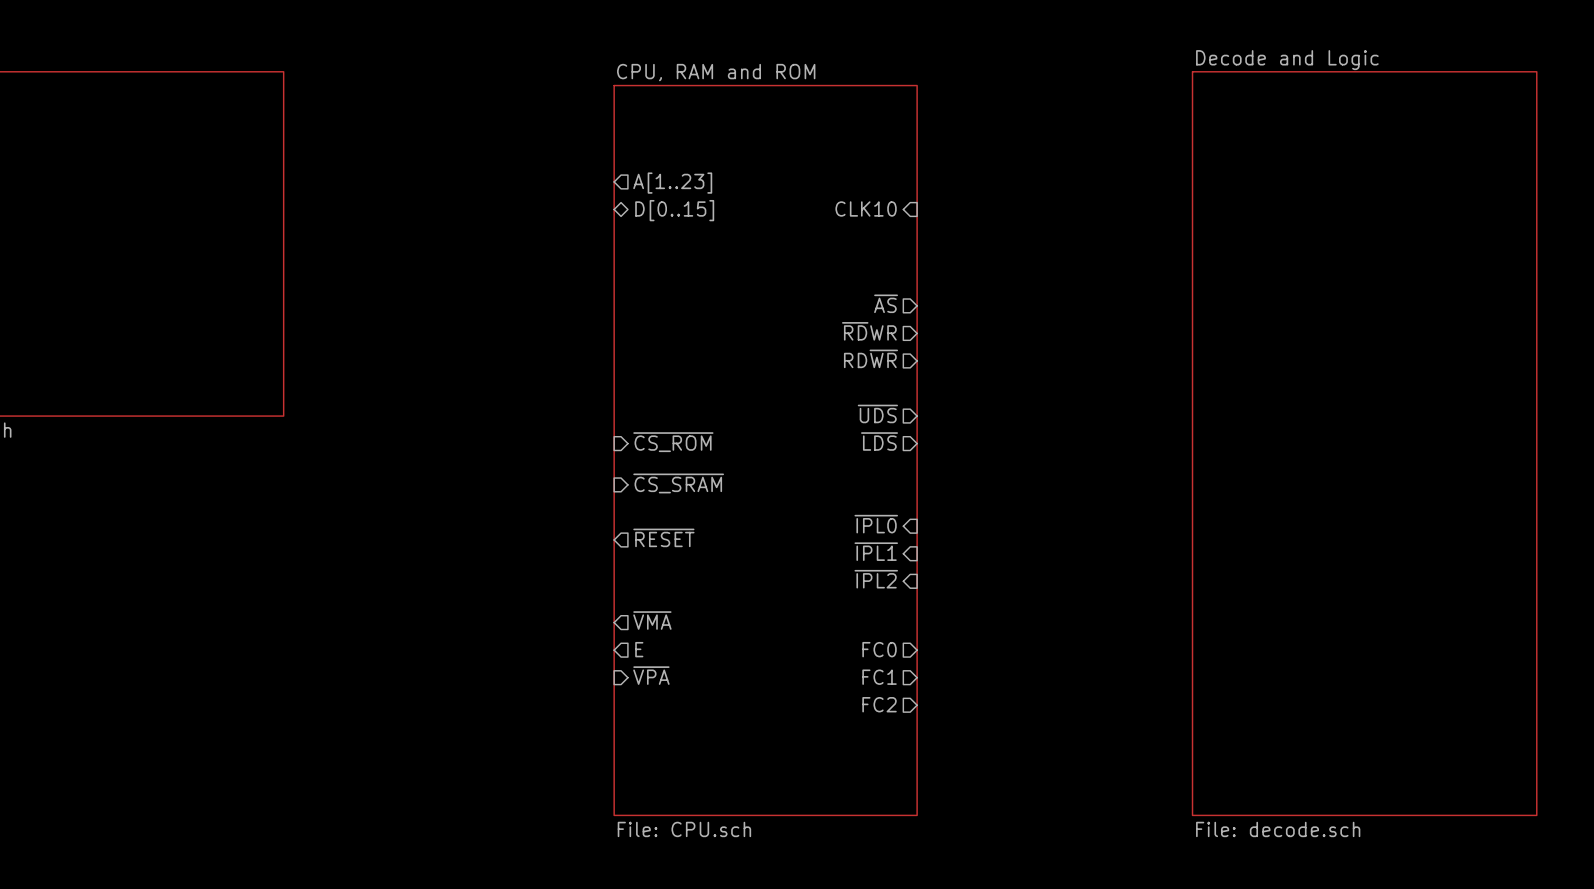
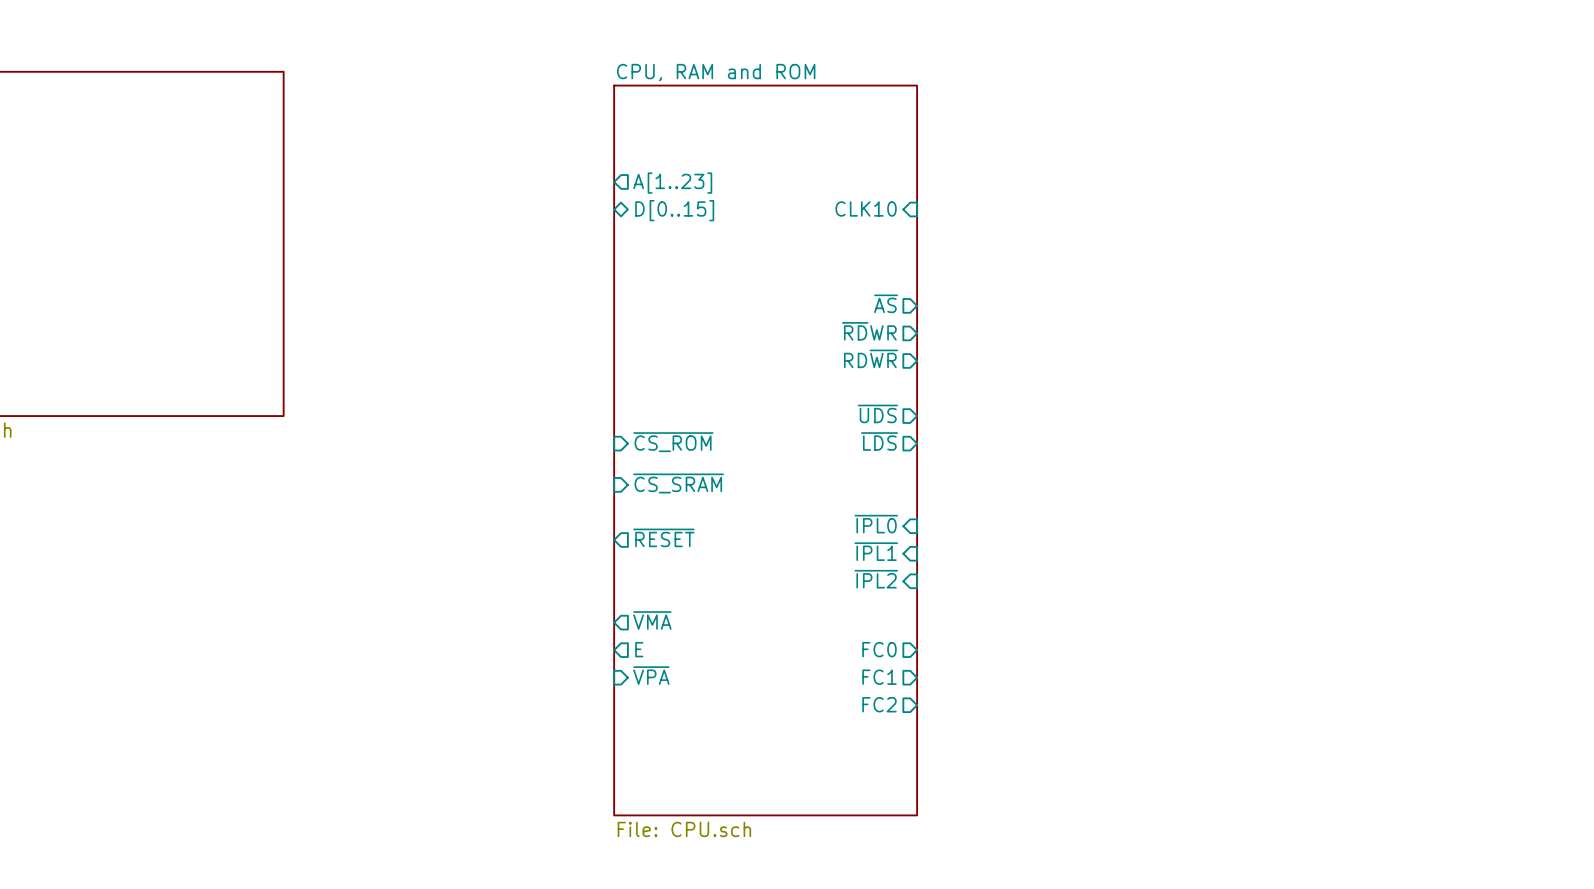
sheet Decode and Logic: File: decode.sch (1364, 443) -> none

